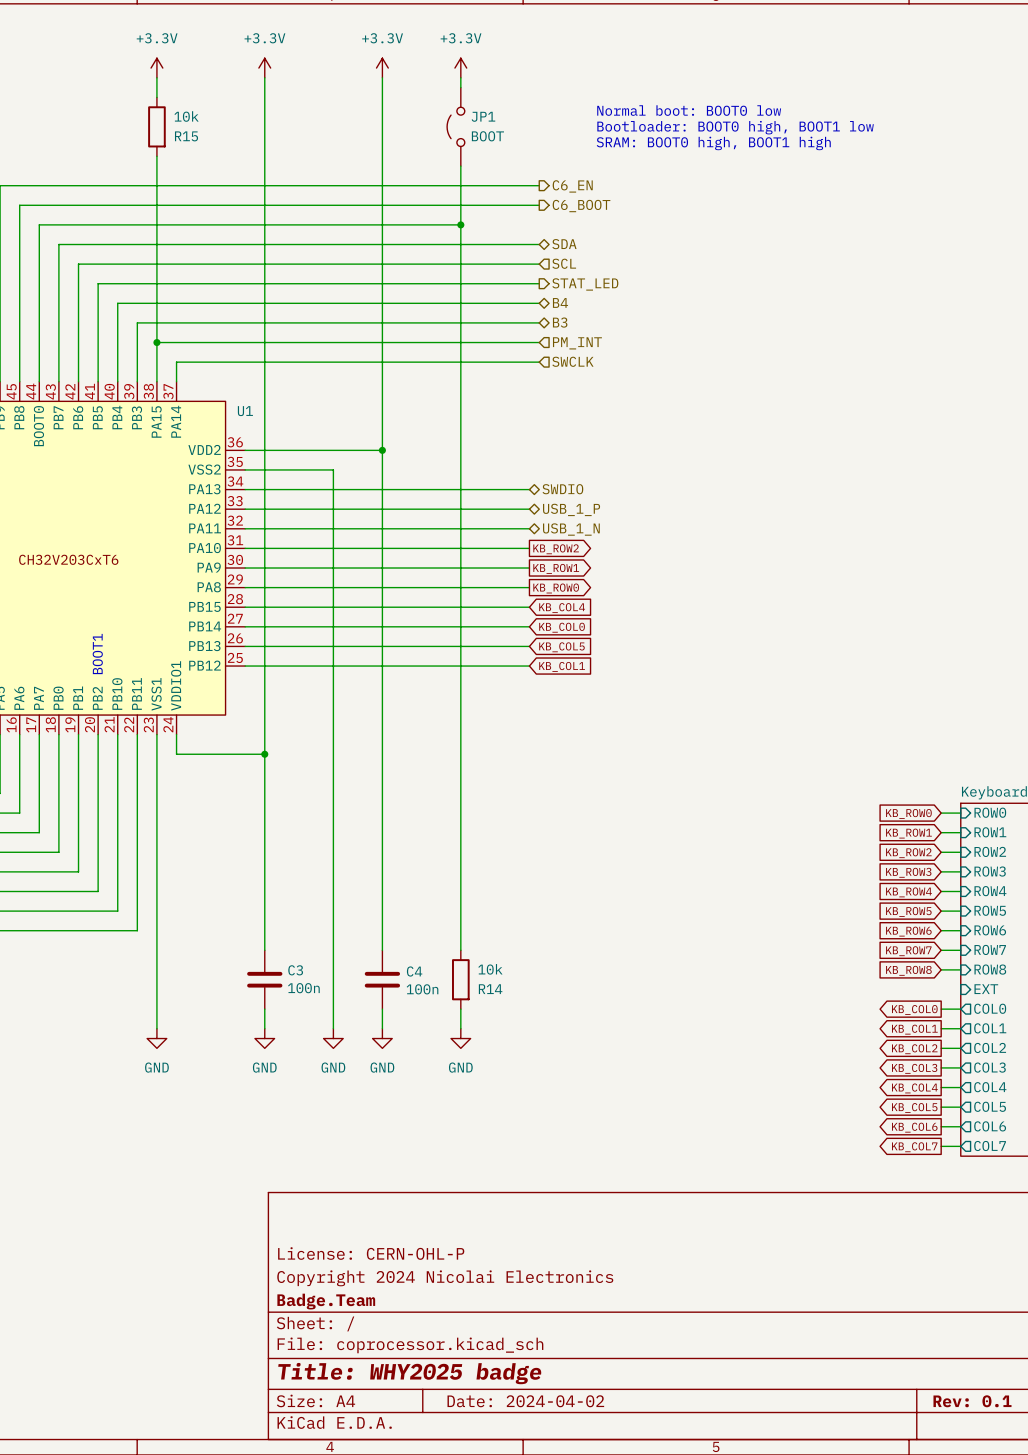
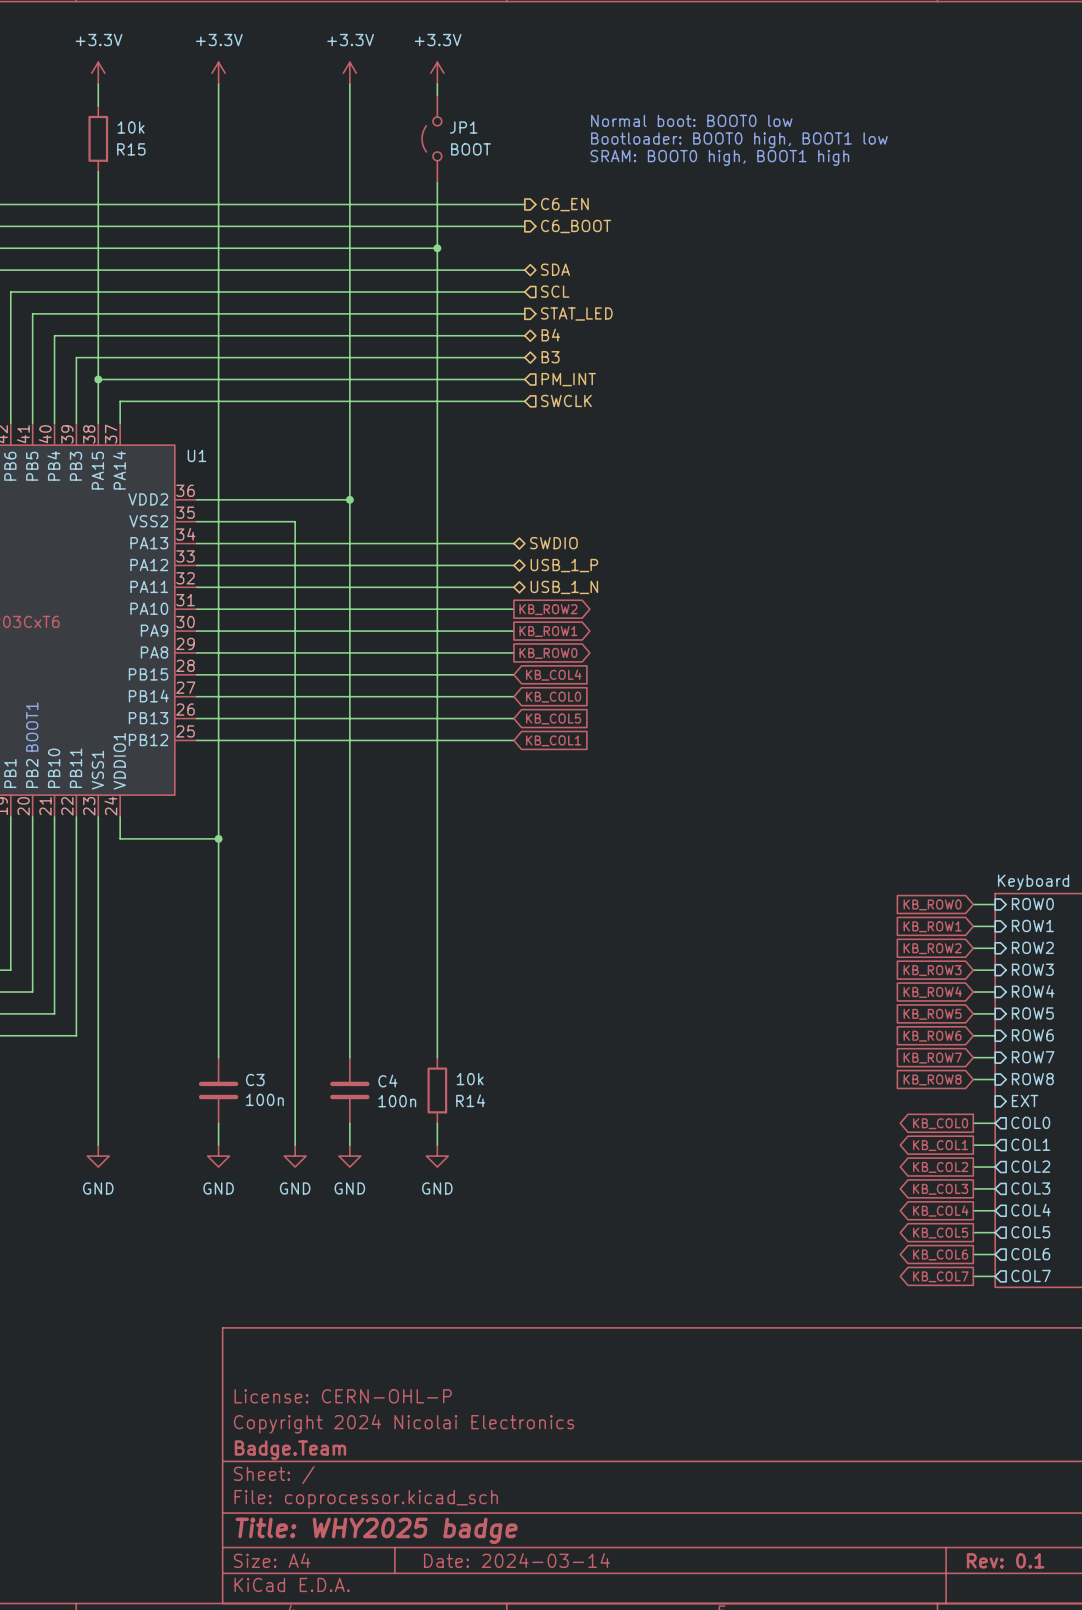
title block: Date: 2024-04-02 (525, 1401) -> Date: 2024-03-14 (516, 1560)

